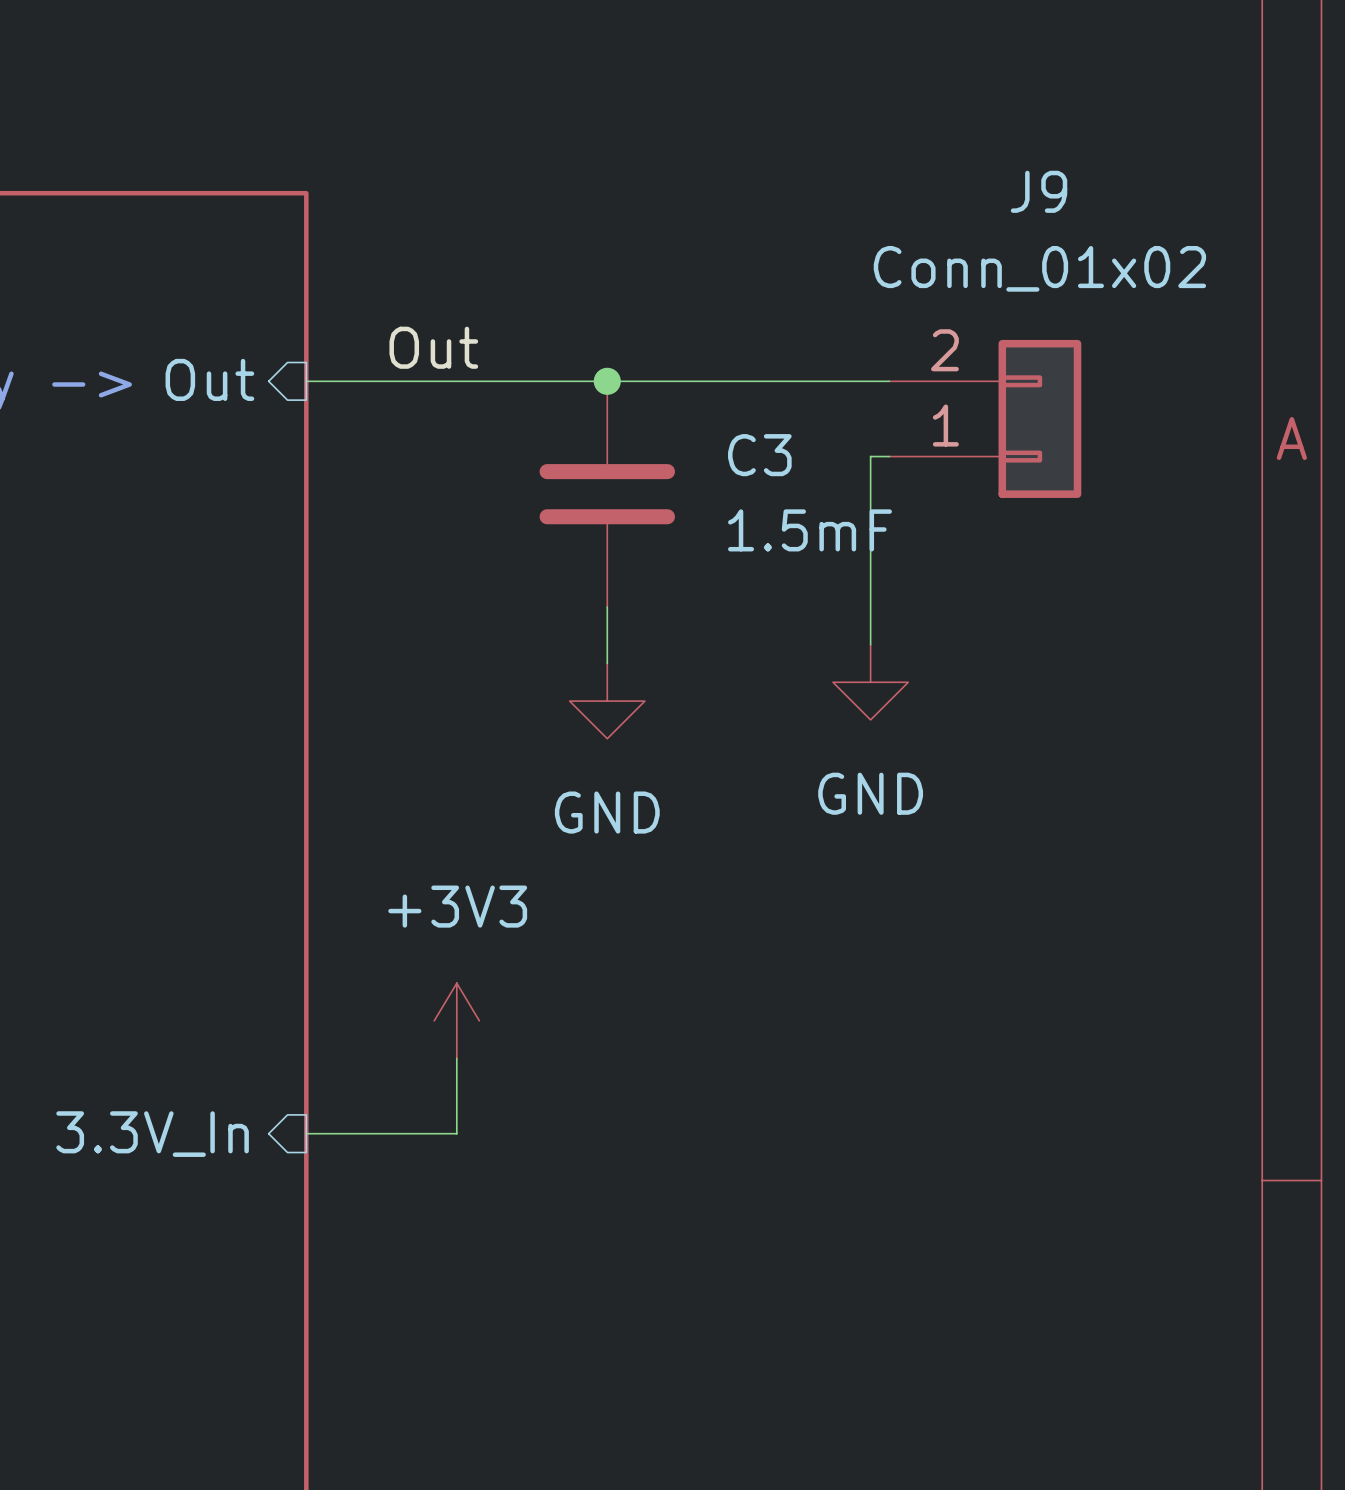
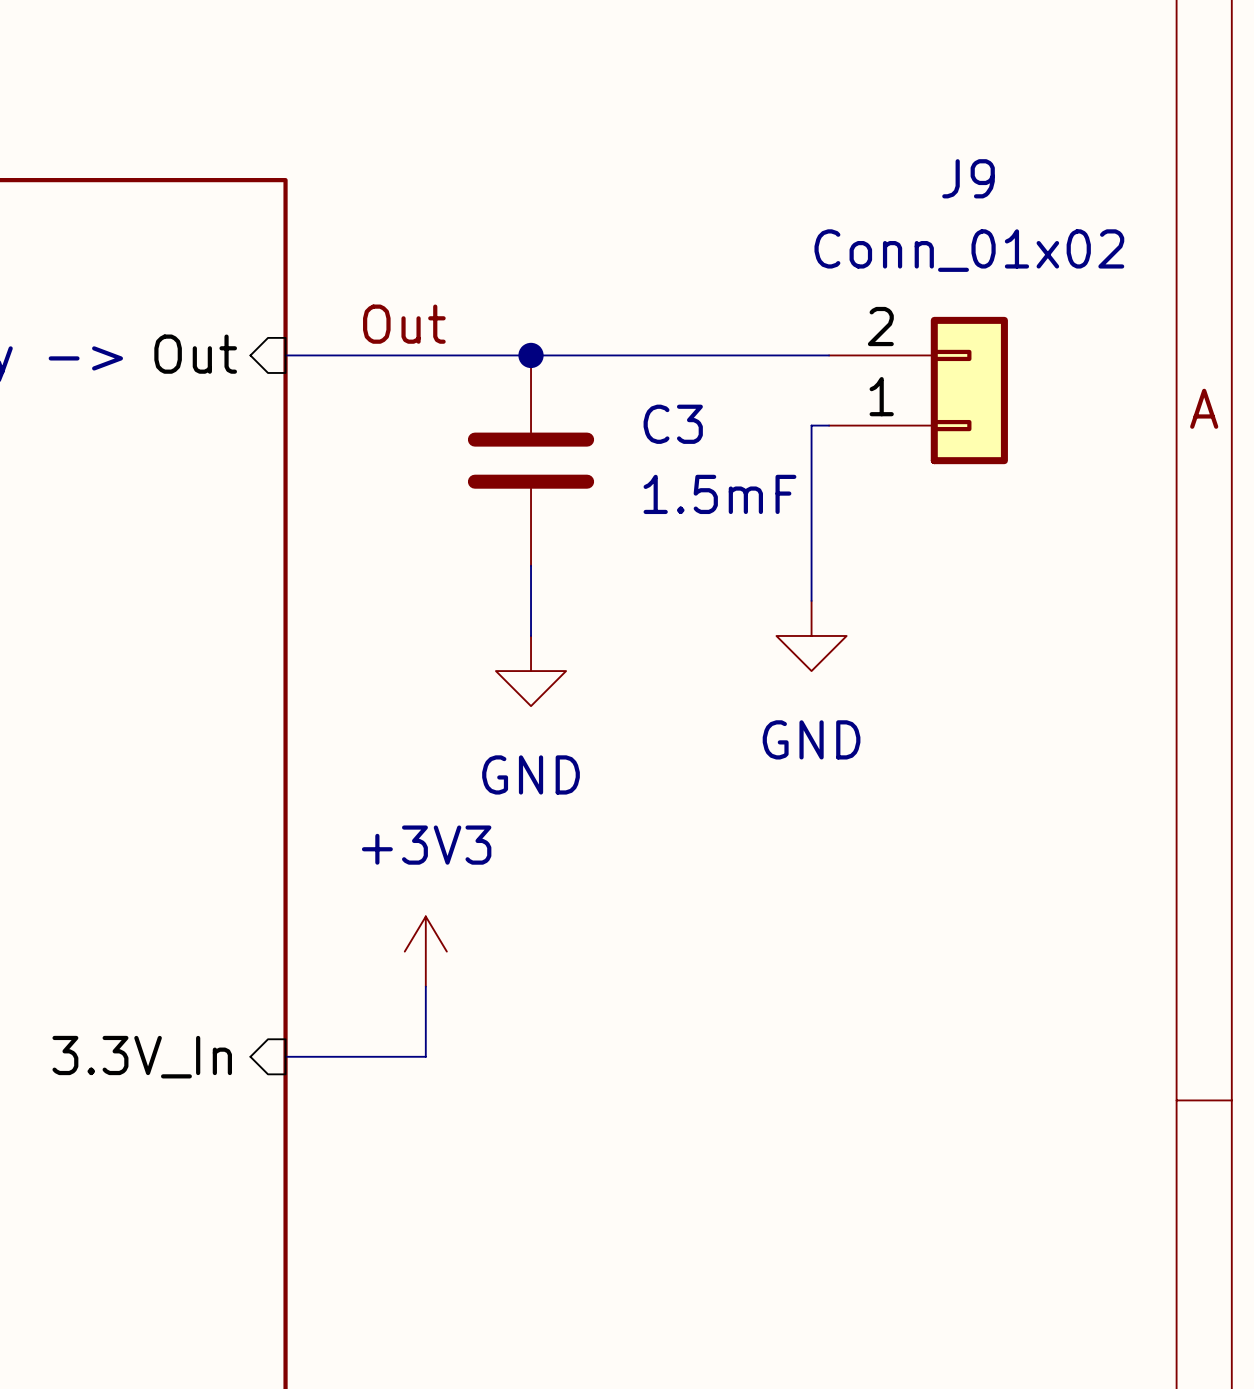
junction position: (607, 381) -> (531, 355)
C3 position: (607, 494) -> (531, 460)
wire: none -> (531, 565) (531, 635)
wire: (607, 607) (607, 663) -> none
power symbol position: GND (607, 701) -> GND (531, 671)

